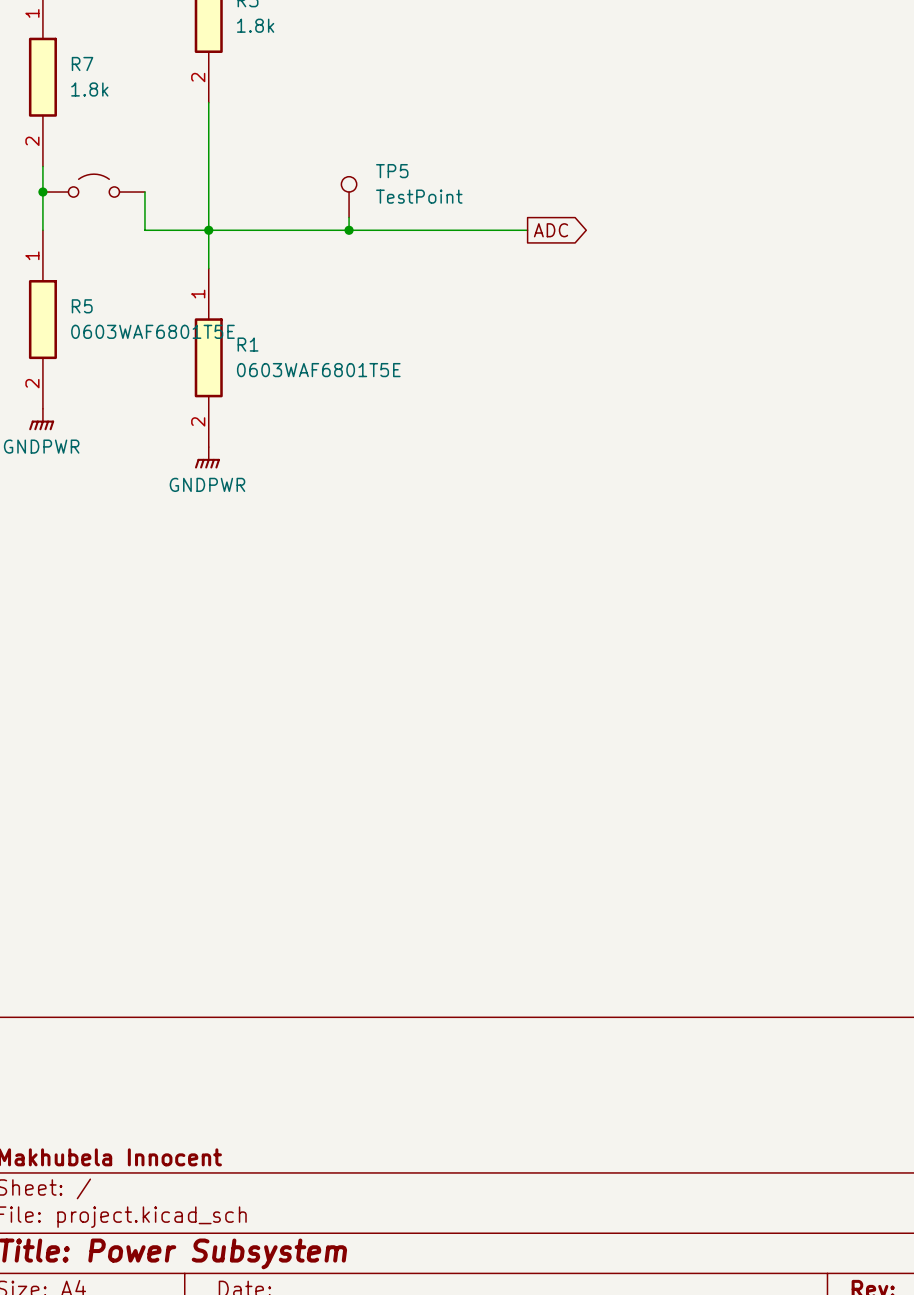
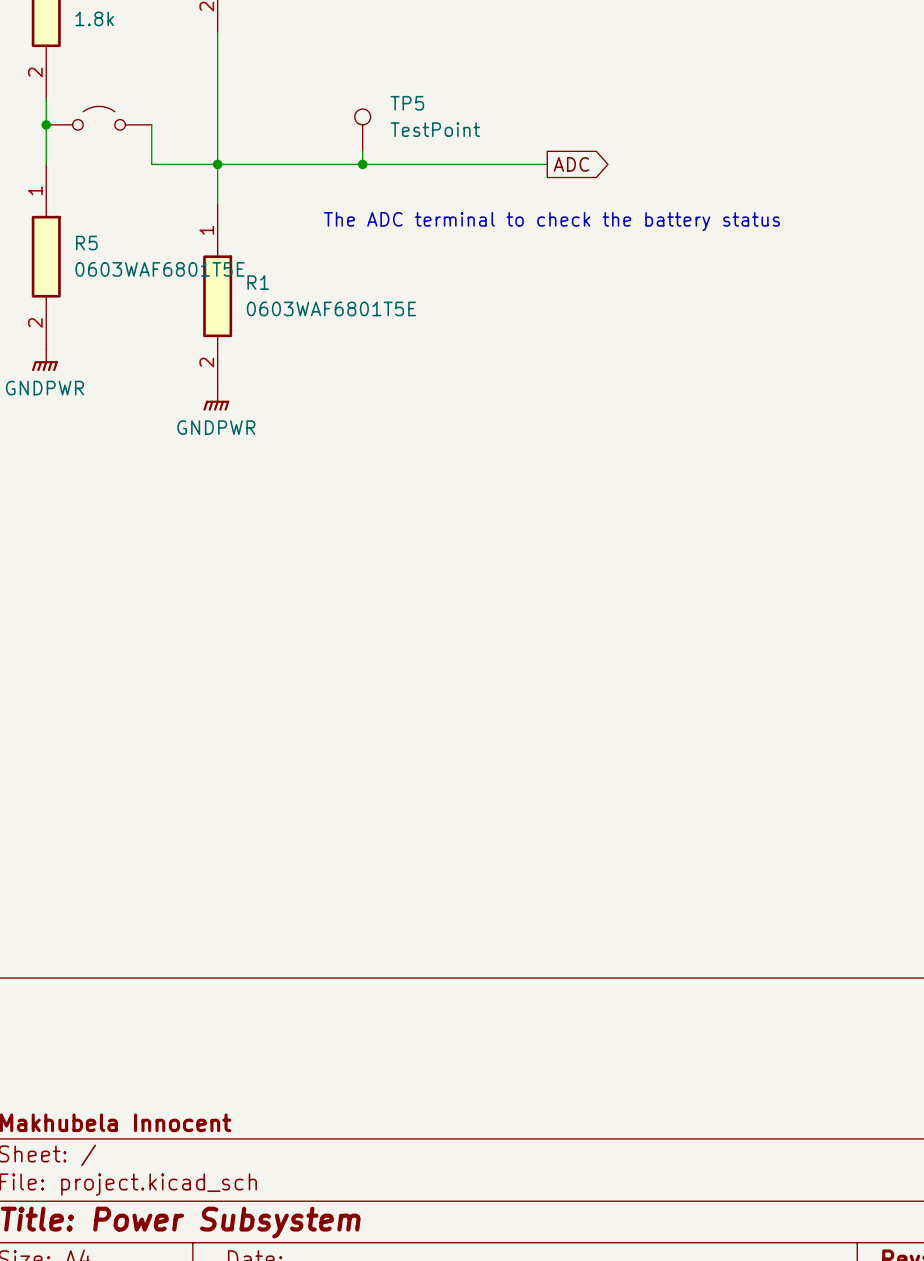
text: none -> The ADC terminal to check the battery status (551, 221)

